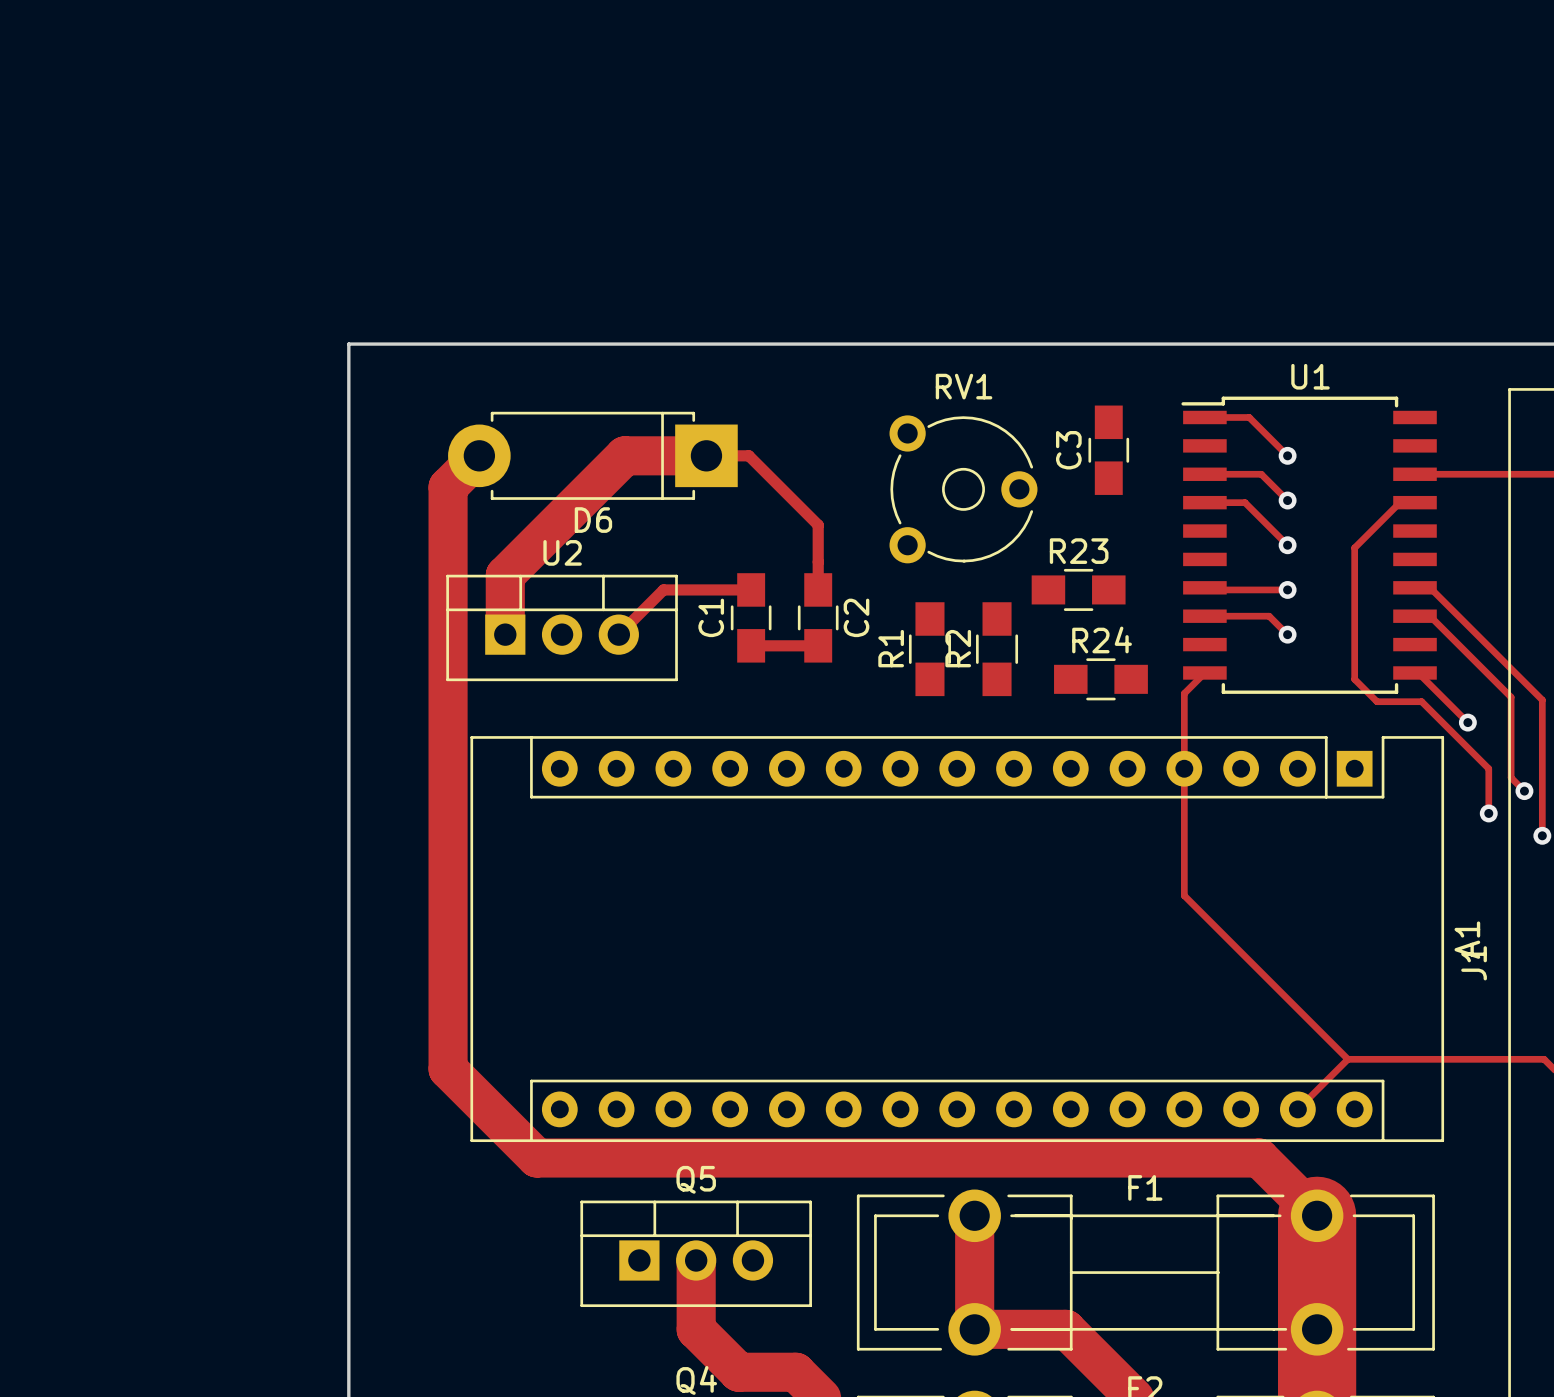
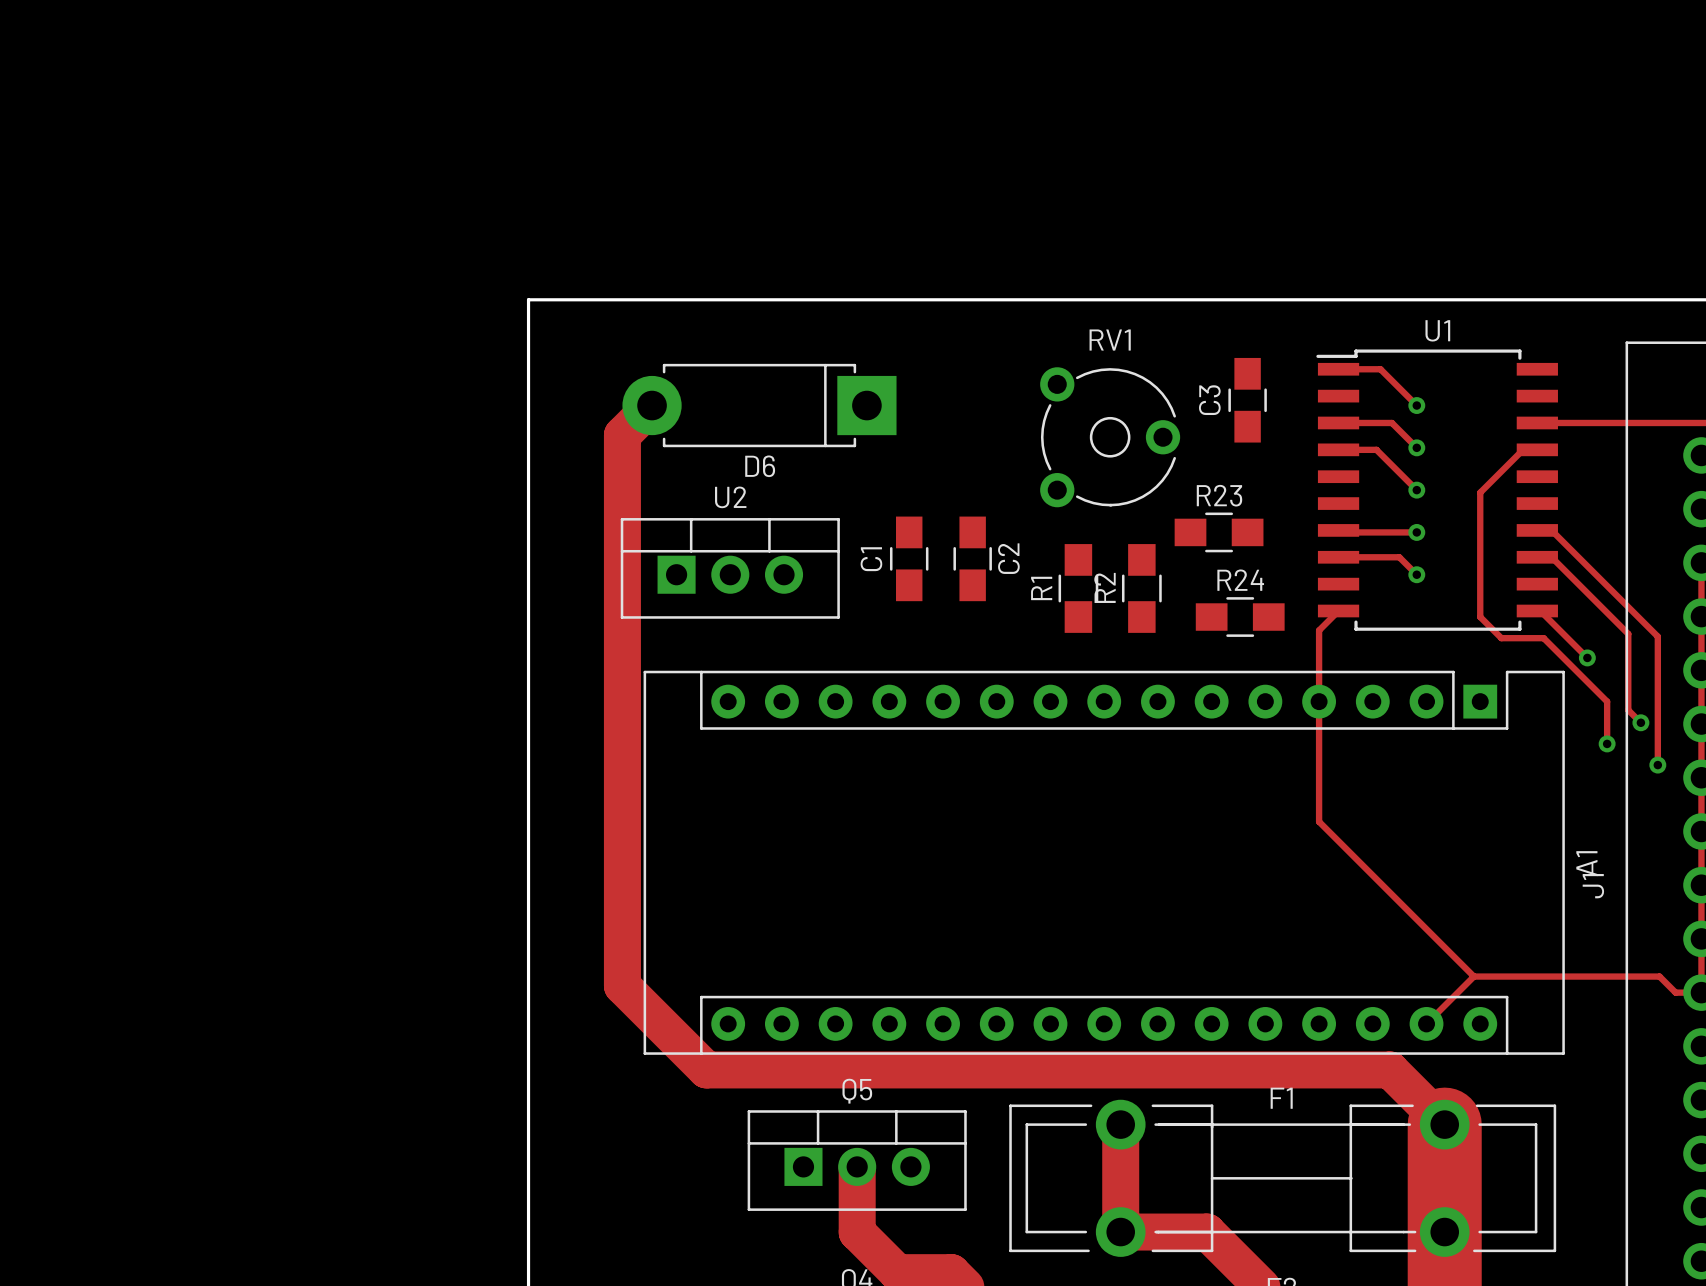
track: (751, 589) (663, 589) (618, 634) -> none
track: (818, 589) (818, 525) (748, 455) (624, 455) (505, 575) (505, 634) -> none
track: (751, 645) (818, 645) -> none

